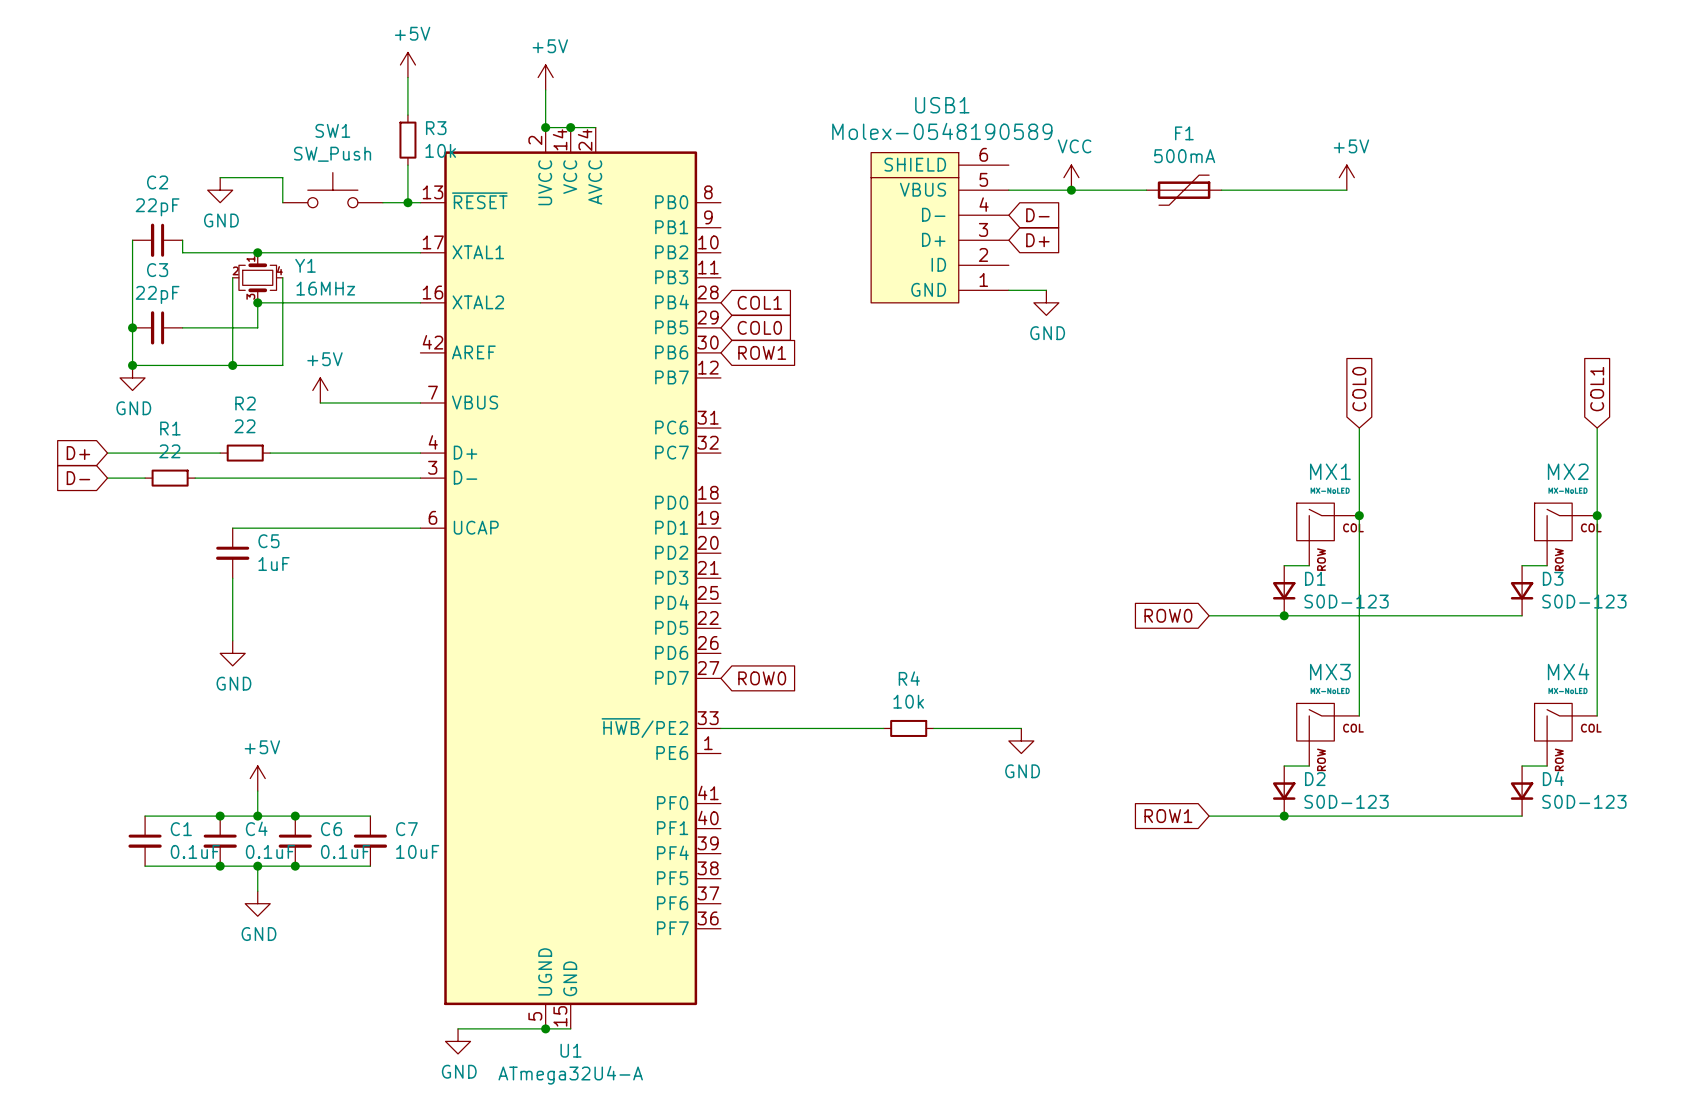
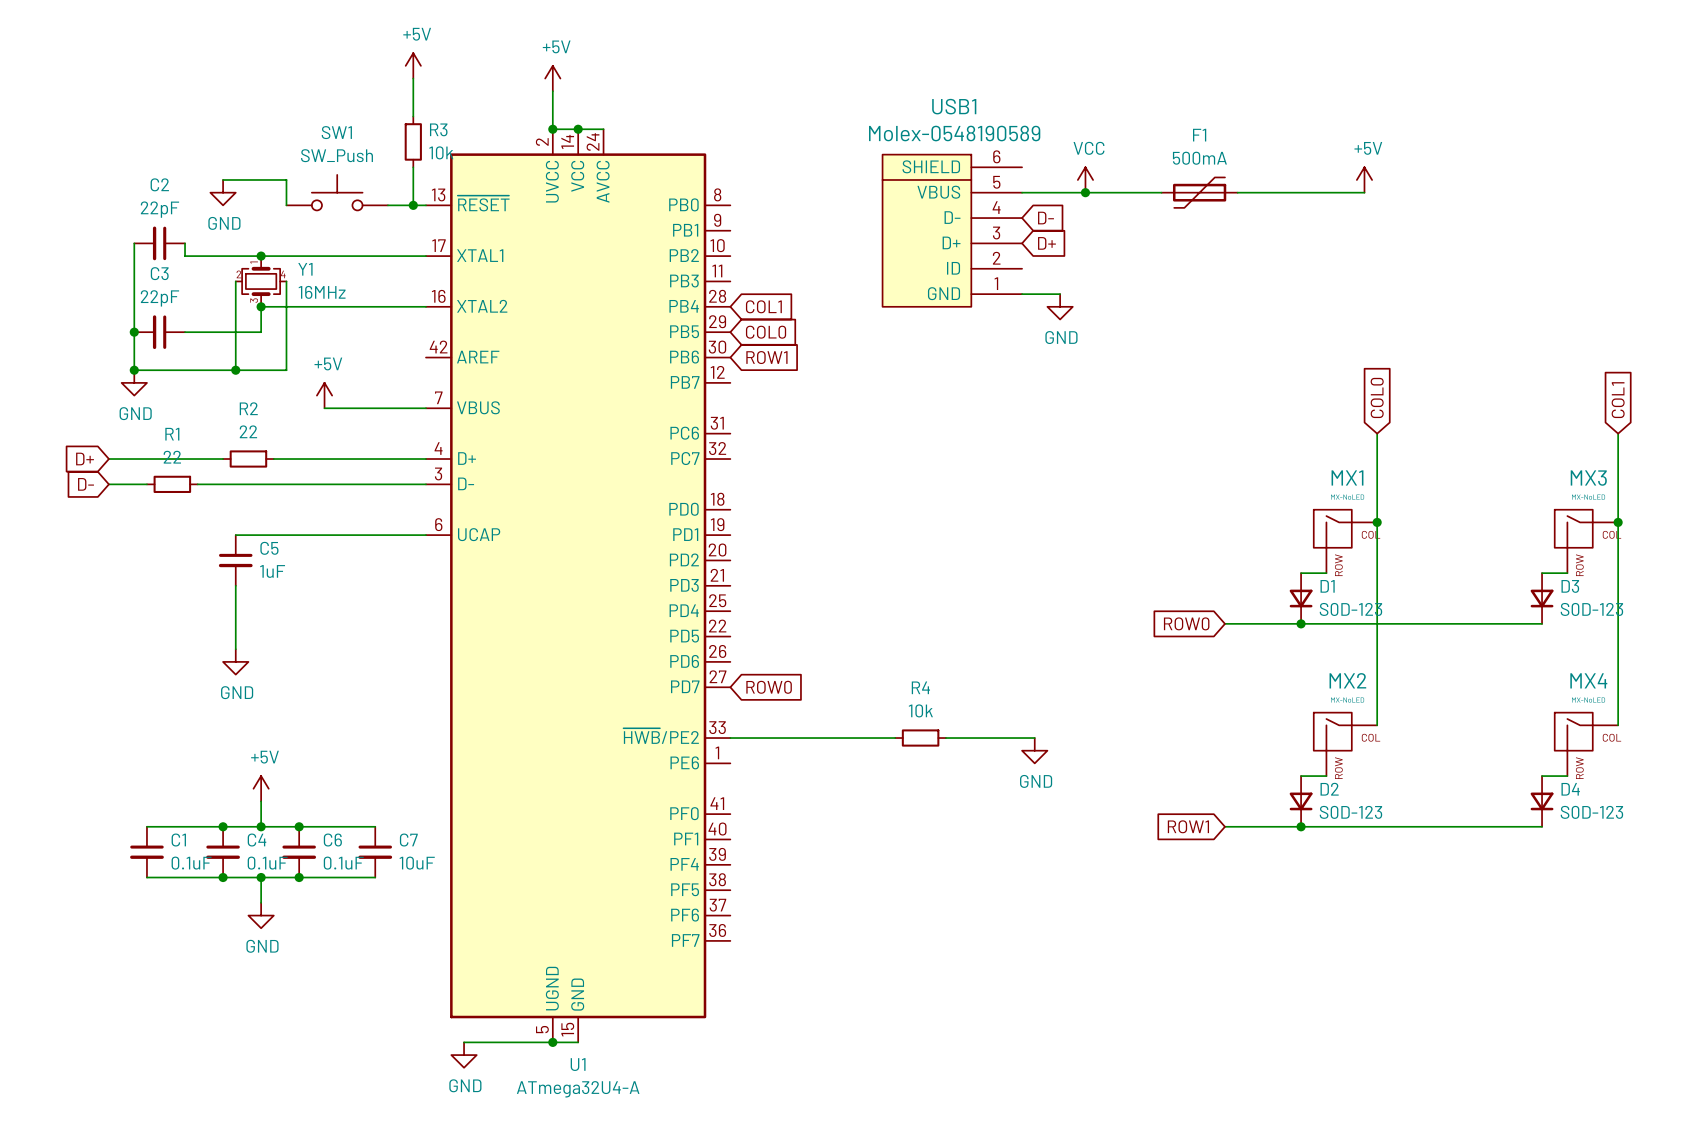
MX2 name: MX2 (1568, 471) -> MX3 (1588, 478)
MX3 name: MX3 (1330, 672) -> MX2 (1347, 680)

